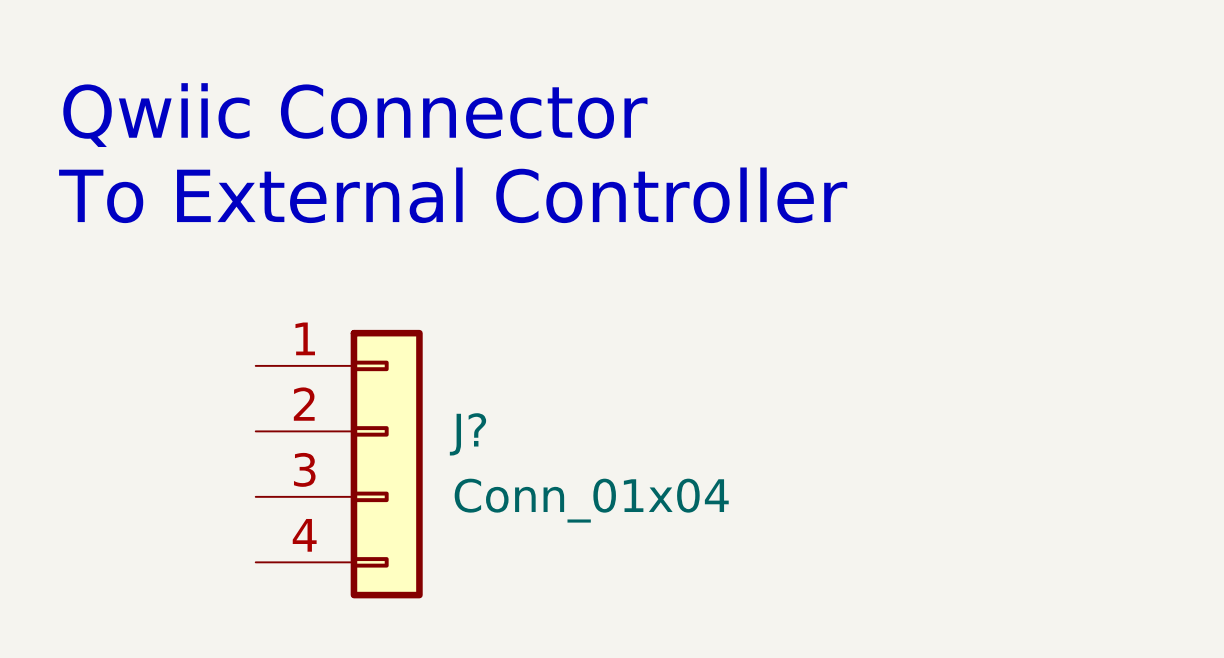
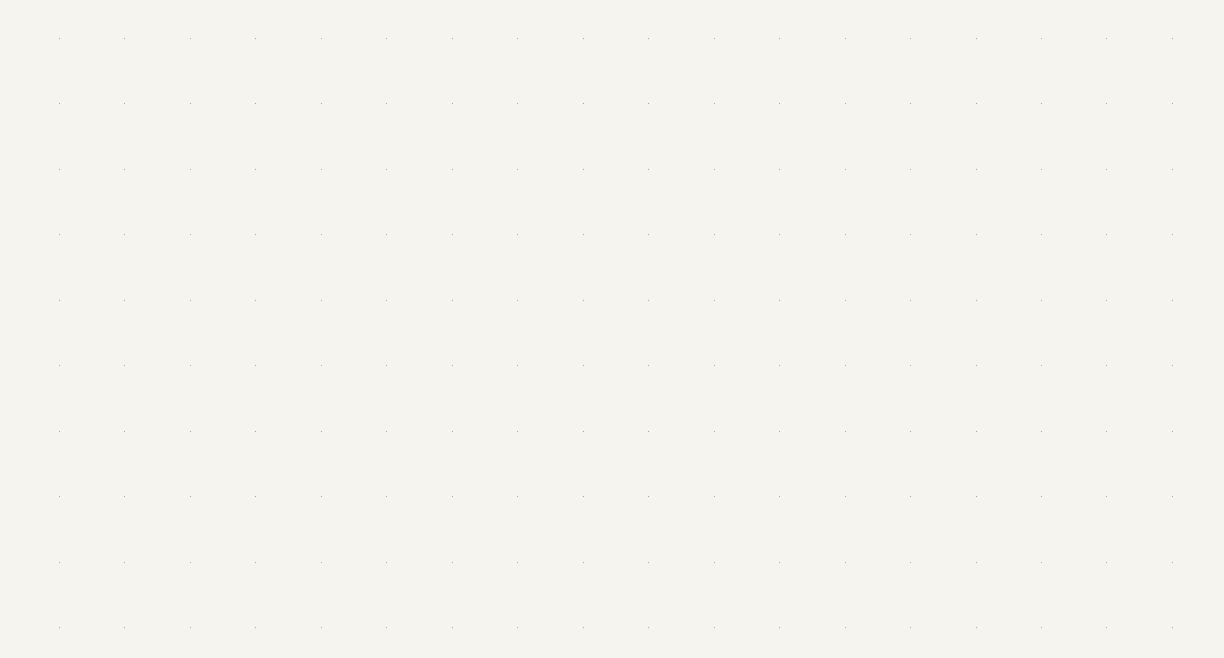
text: Qwiic Connector (355, 115) -> none
text: To External Controller (453, 195) -> none
J?: Conn_01x04 (339, 464) -> none

